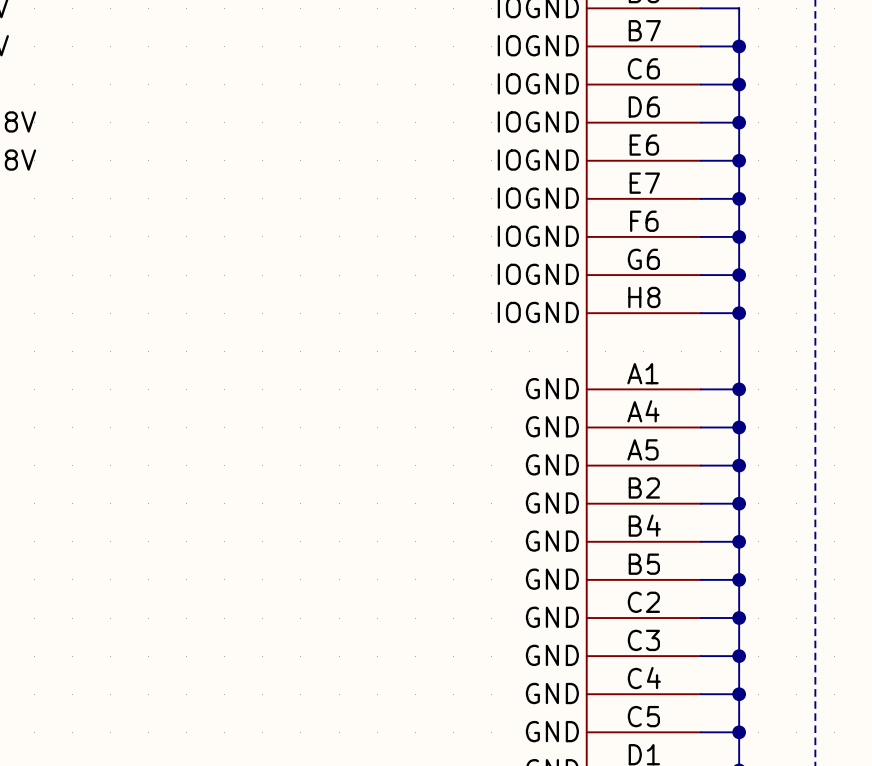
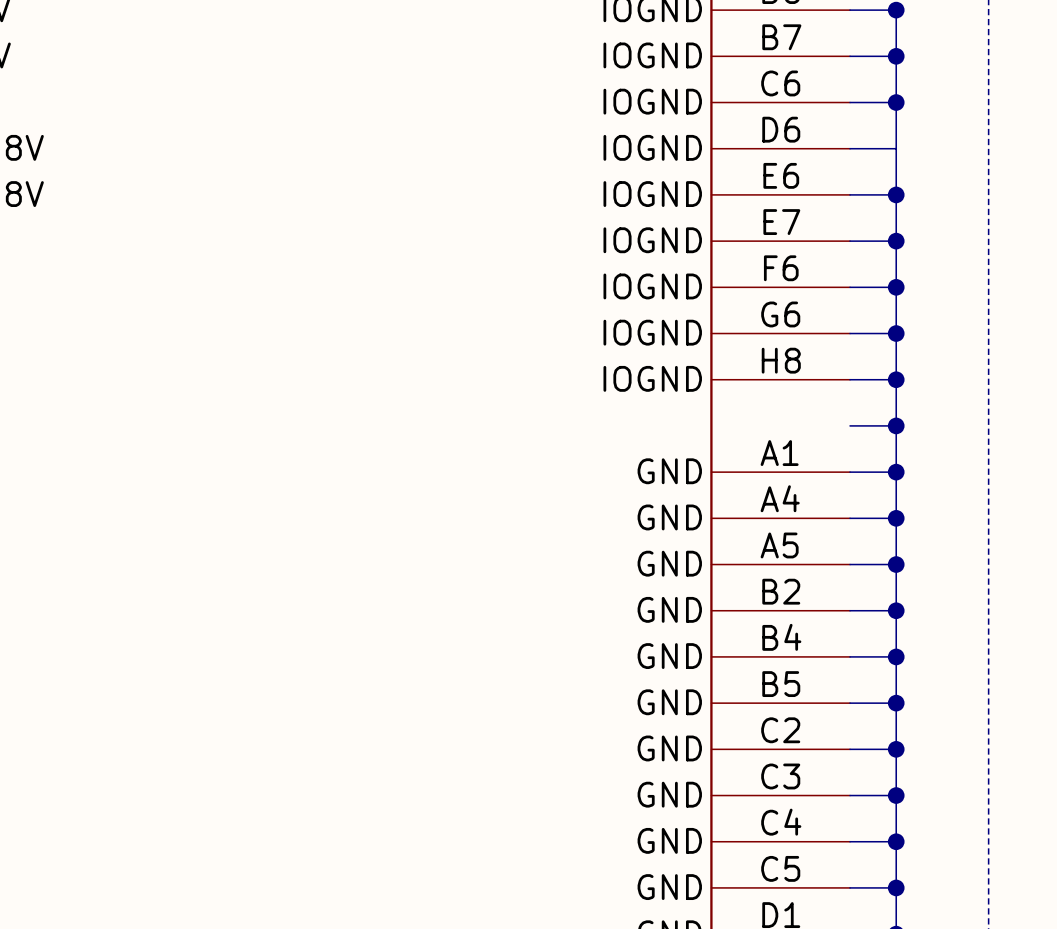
junction: none -> (896, 10)
junction: (739, 122) -> none
wire: none -> (850, 425) (896, 425)
junction: none -> (896, 425)

